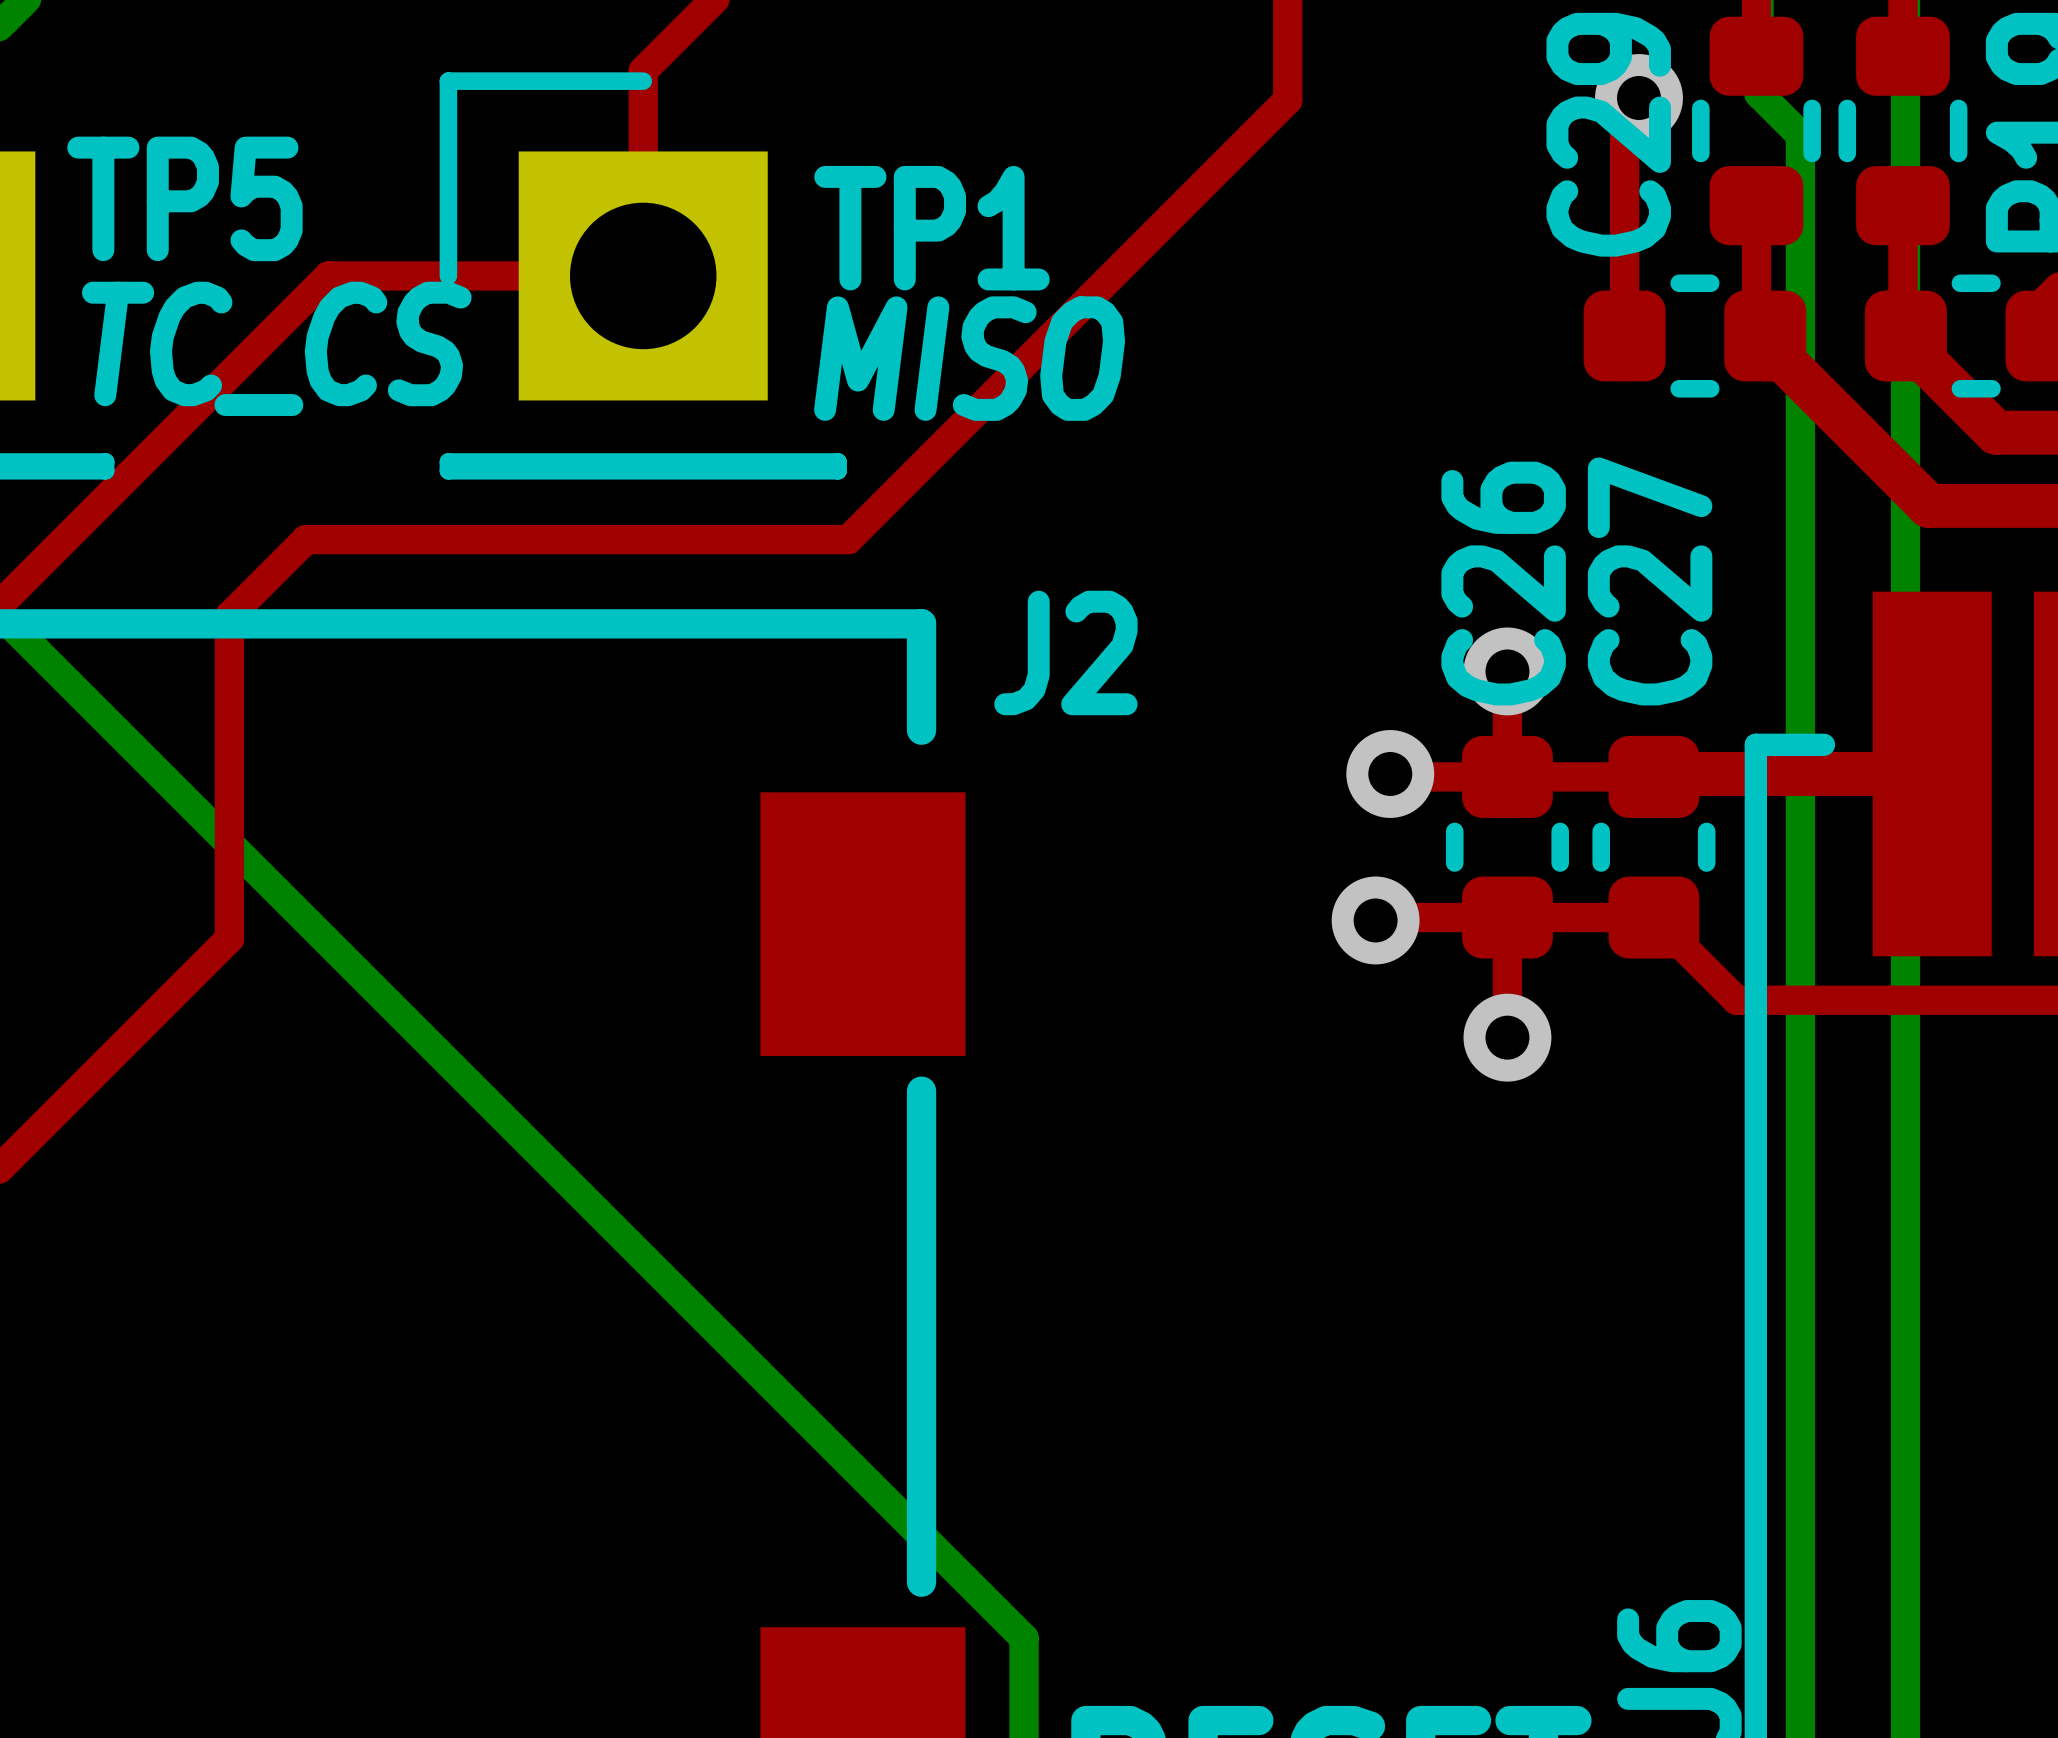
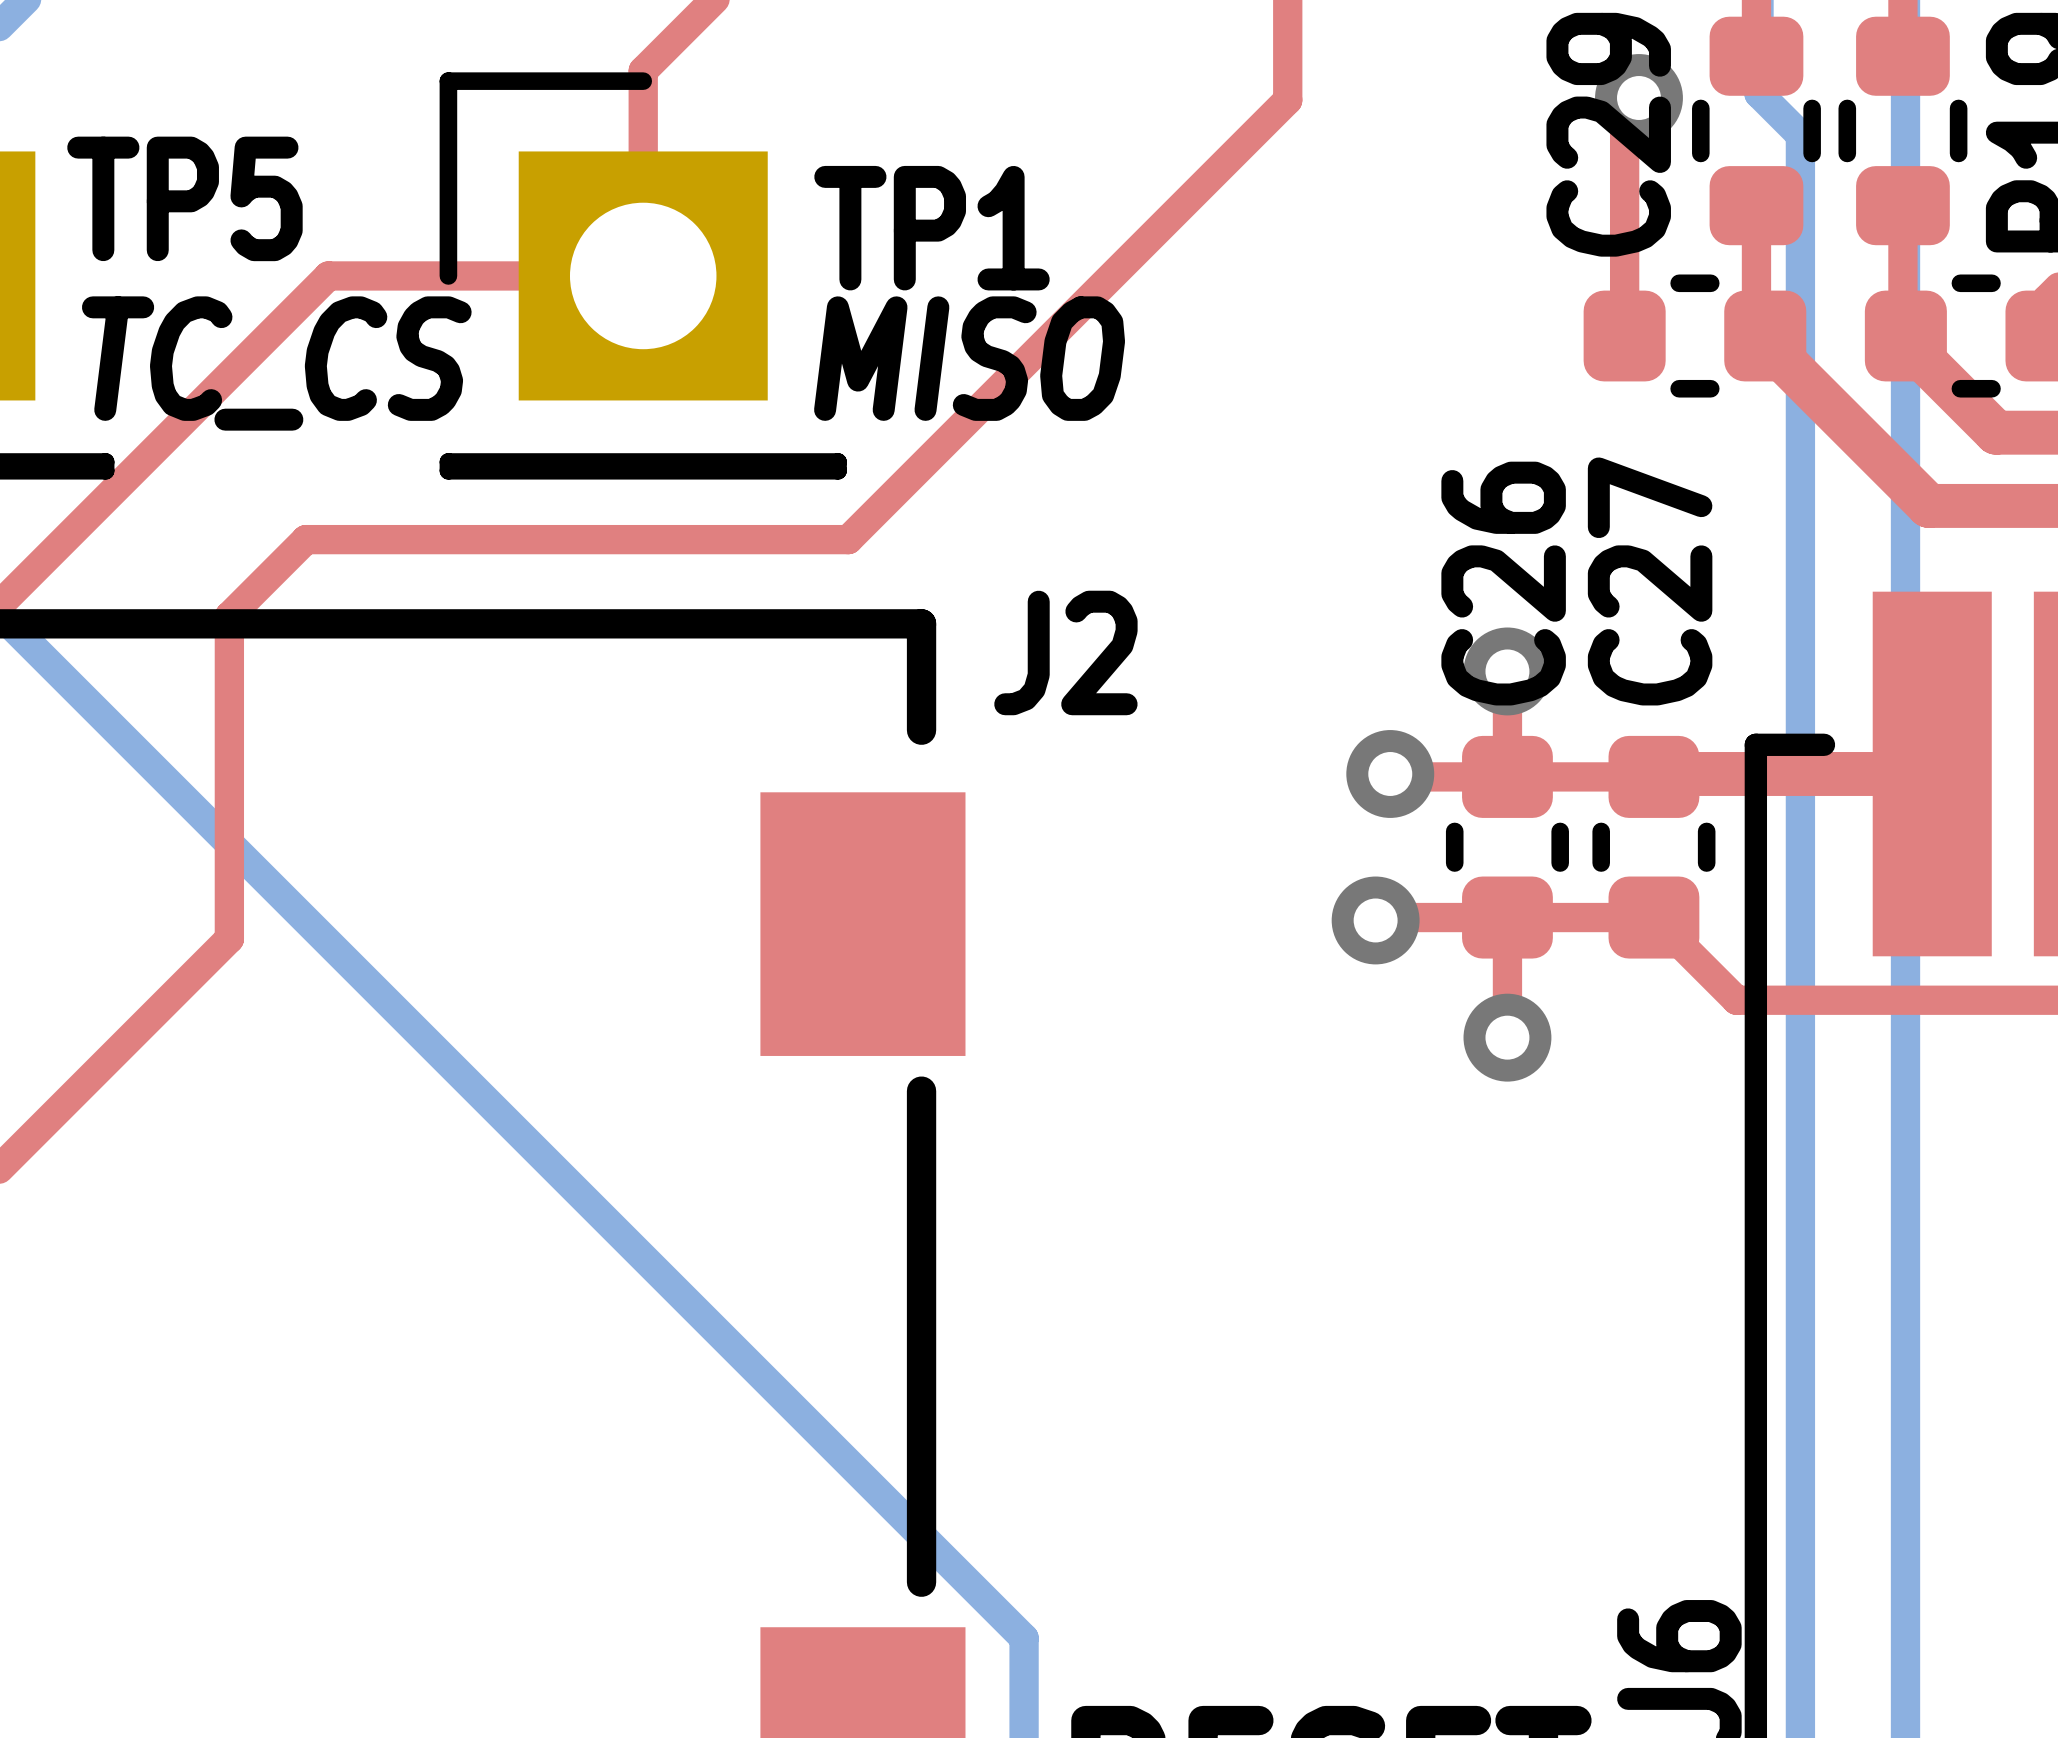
text position: TC_CS (276, 348) -> TC_CS (276, 363)

